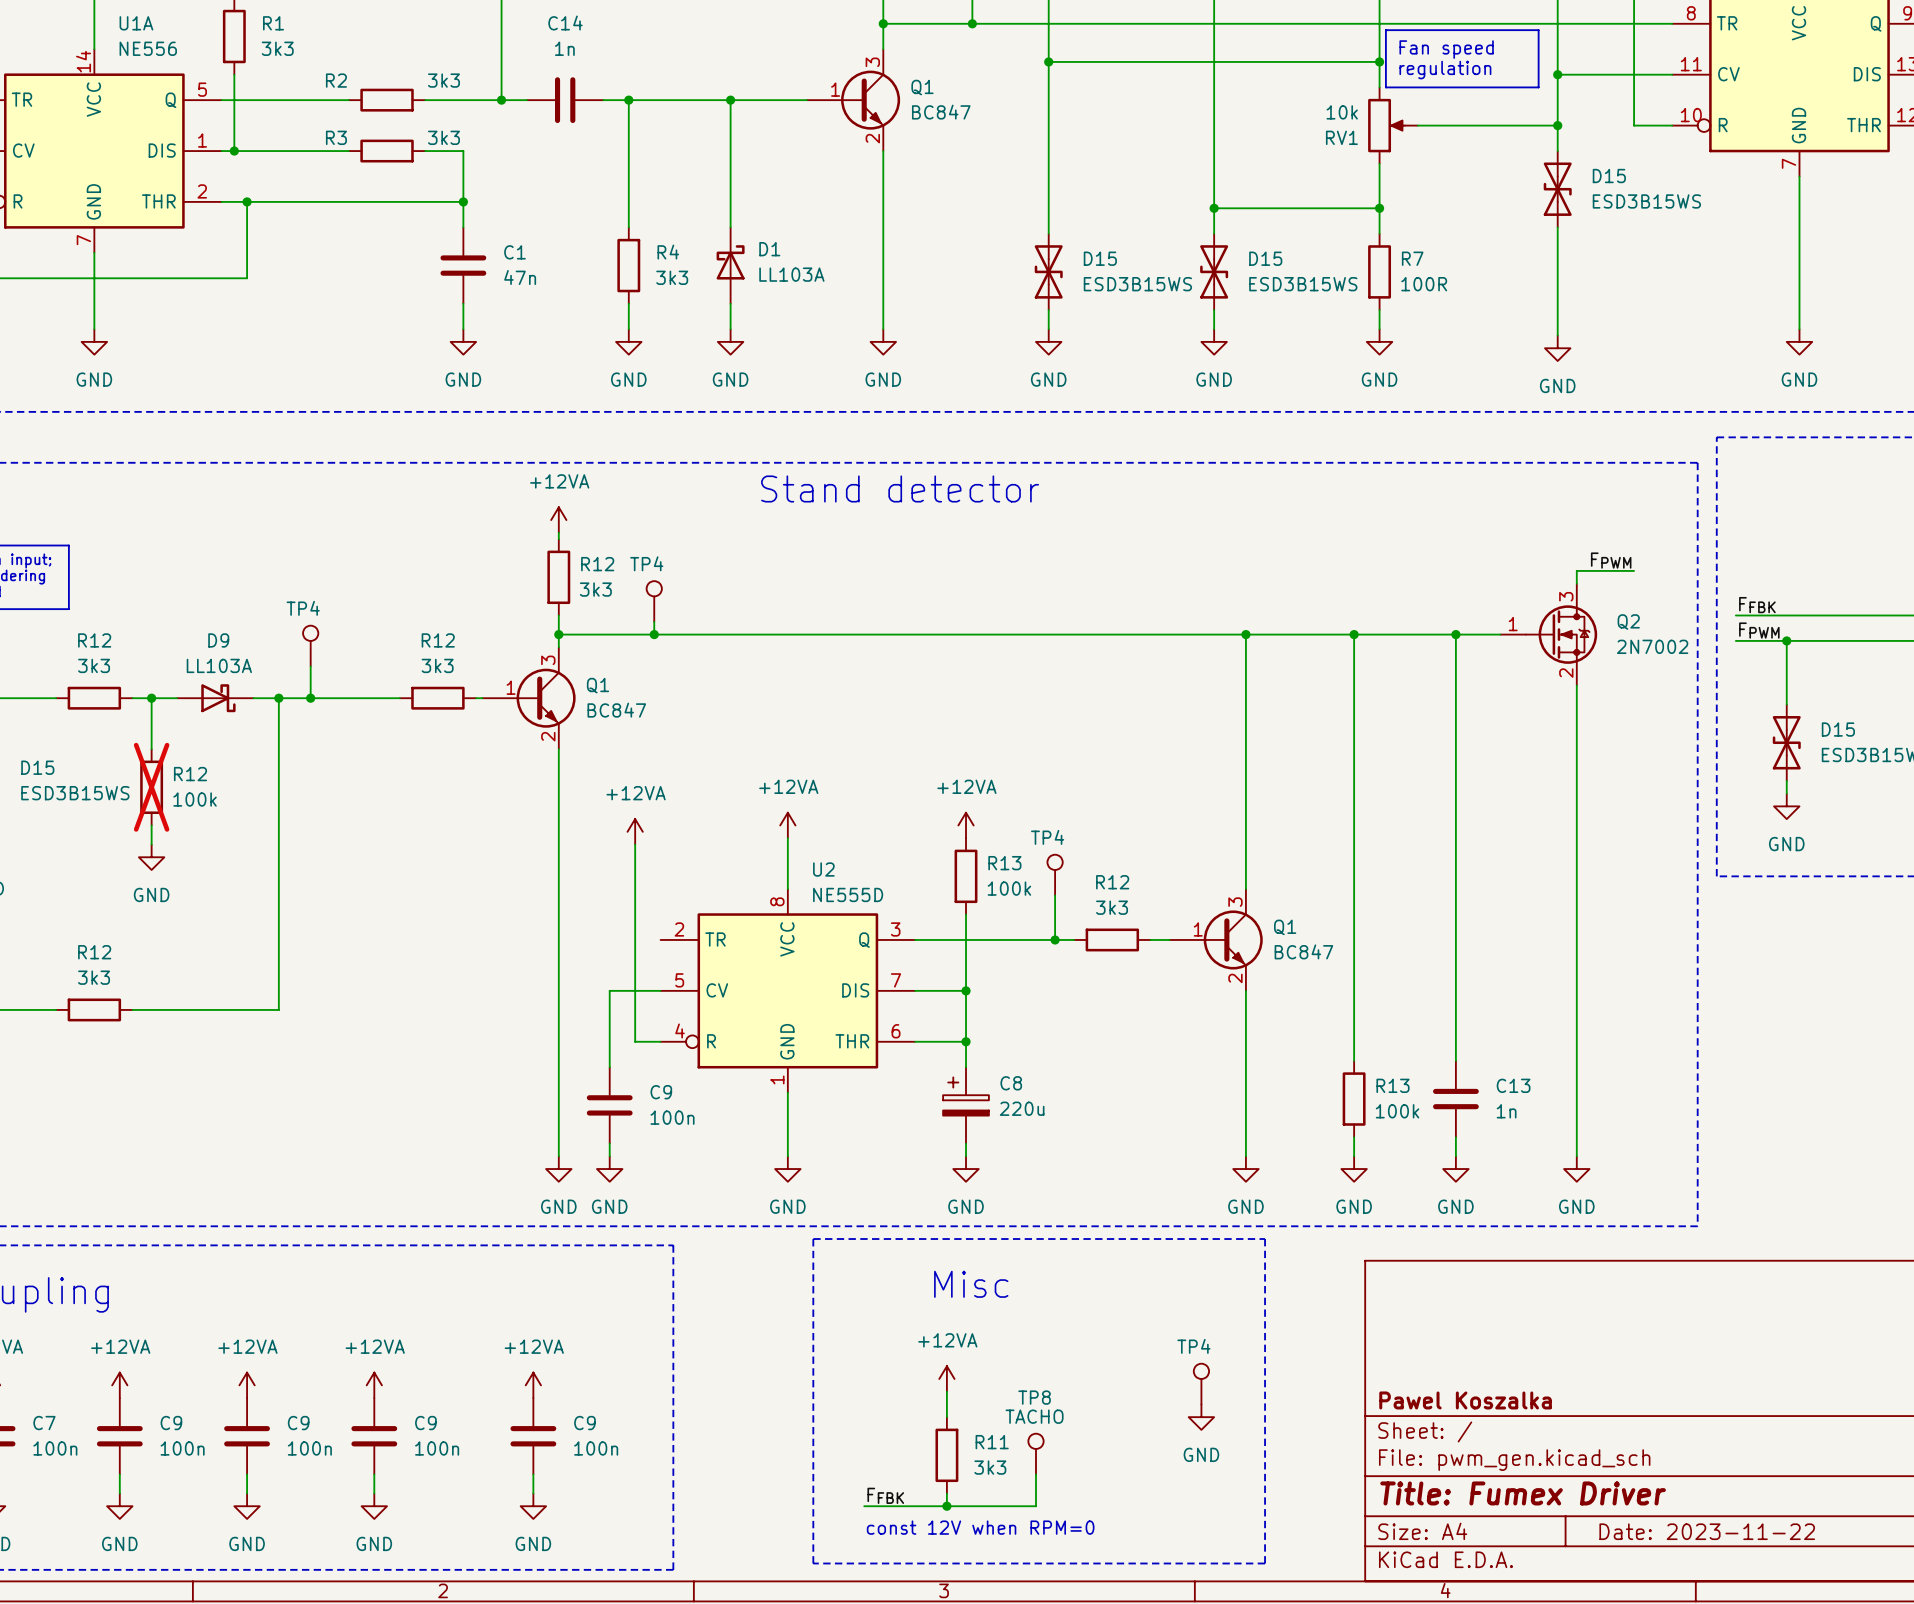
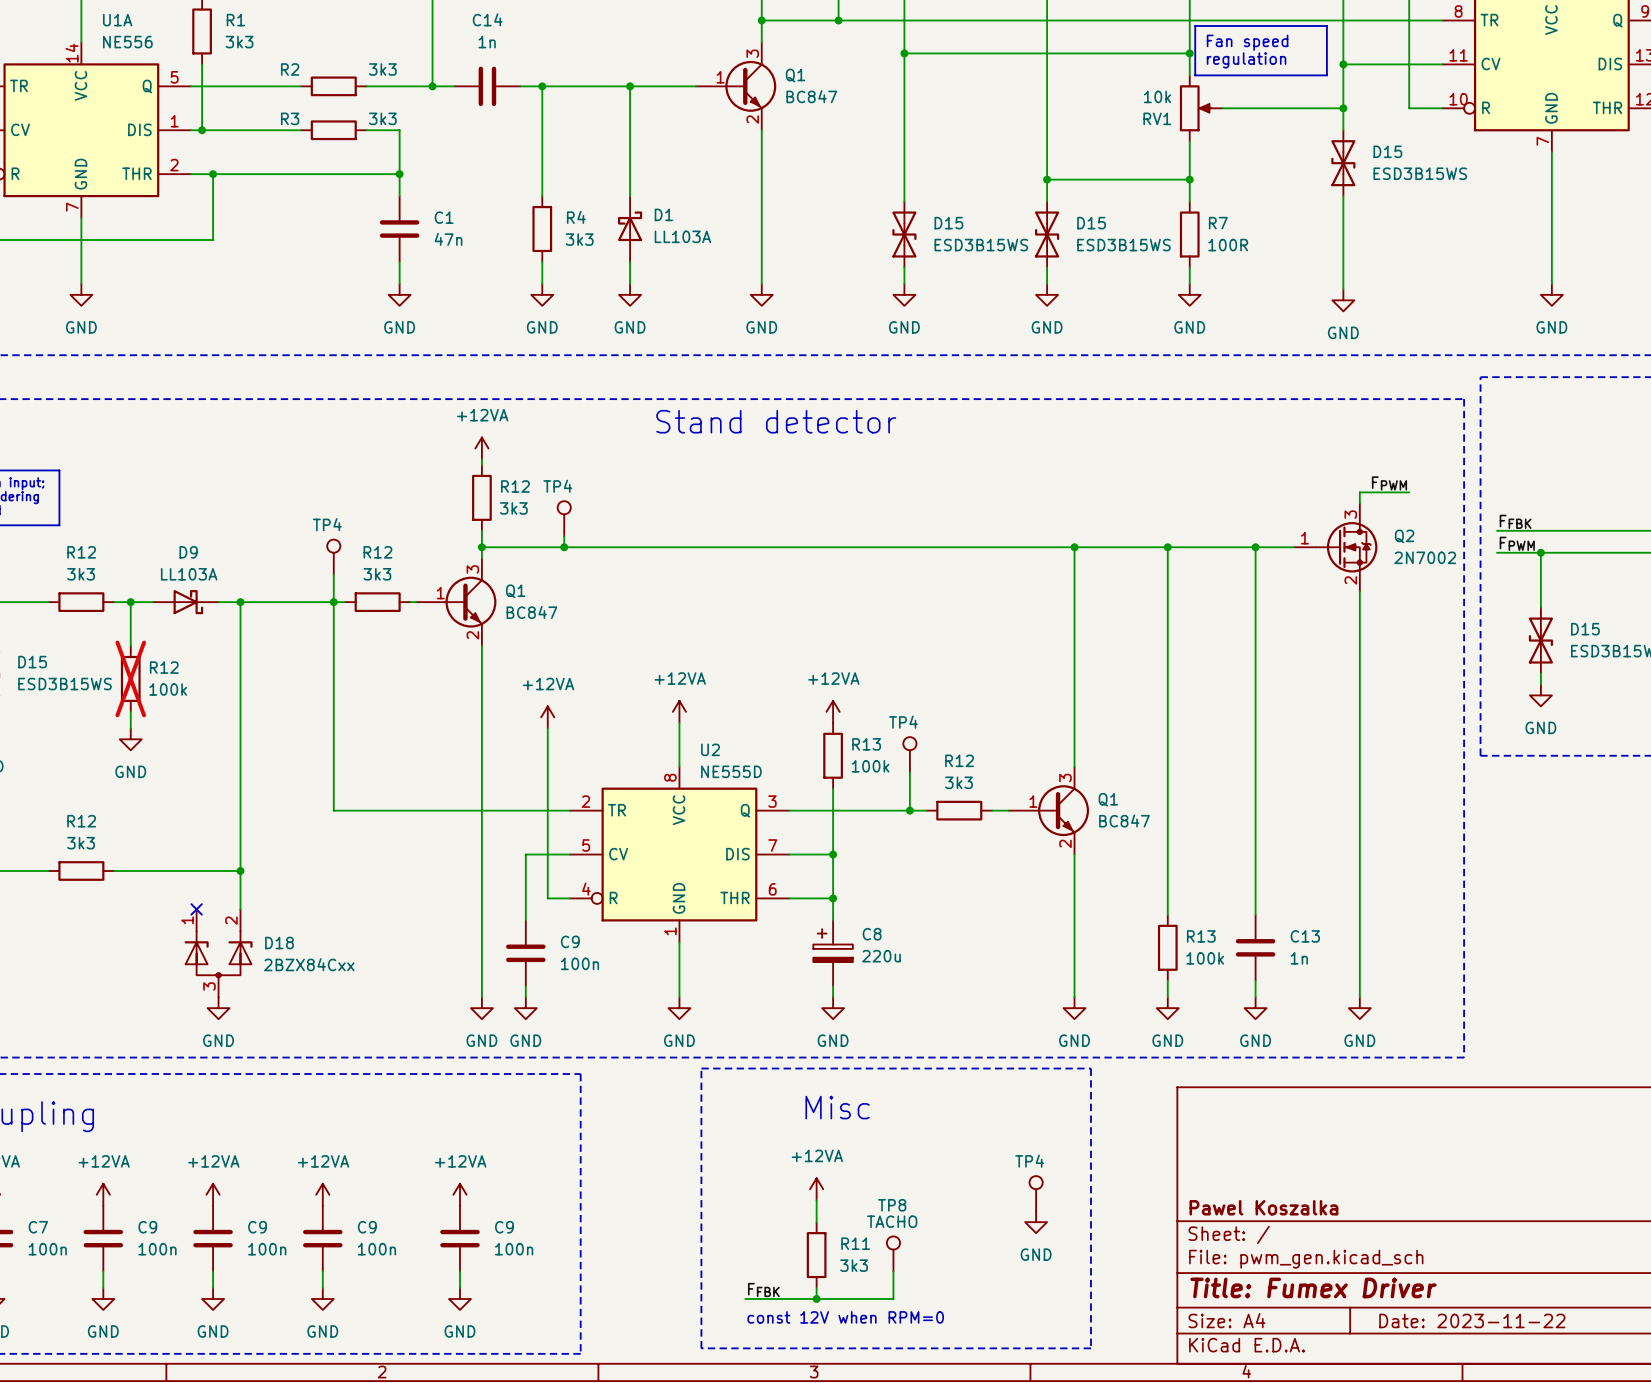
TP4 position: (310, 646) -> (333, 557)
wire: (310, 666) (310, 698) -> none
wire: none -> (333, 574) (333, 810) (569, 810)
junction: (310, 698) -> none
junction: none -> (333, 602)
wire: none -> (240, 870) (240, 909)
junction: none -> (240, 870)
no-connect mark: none -> (196, 909)
D18: none -> 2BZX84Cxx (218, 953)
power symbol: none -> GND (218, 1008)

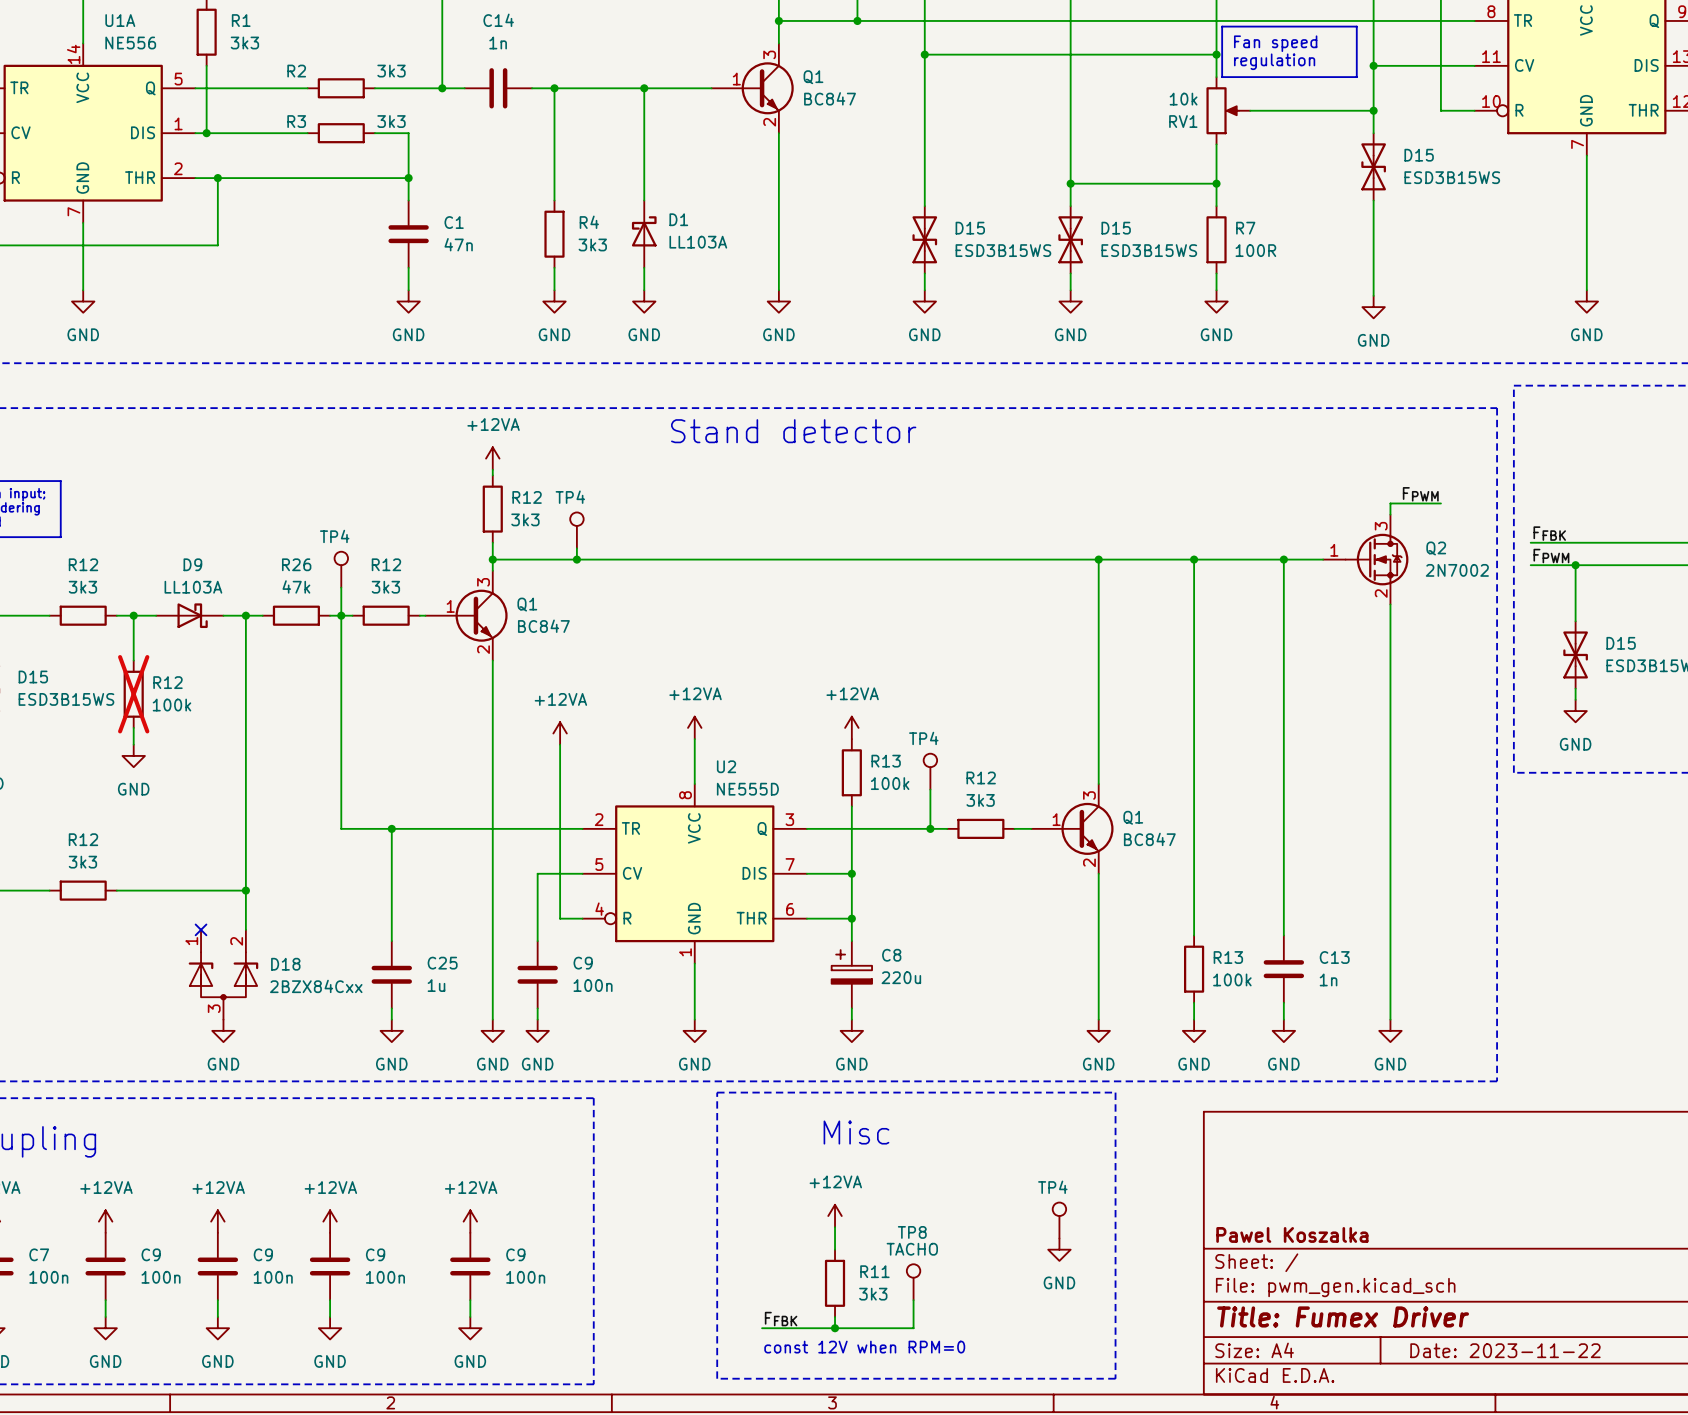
wire: (256, 602) (322, 602) -> none
R26: none -> 47k (296, 615)
wire: none -> (391, 828) (391, 941)
junction: none -> (391, 828)
C25: none -> 1u (391, 974)
wire: none -> (391, 1008) (391, 1019)
power symbol: none -> GND (391, 1030)

